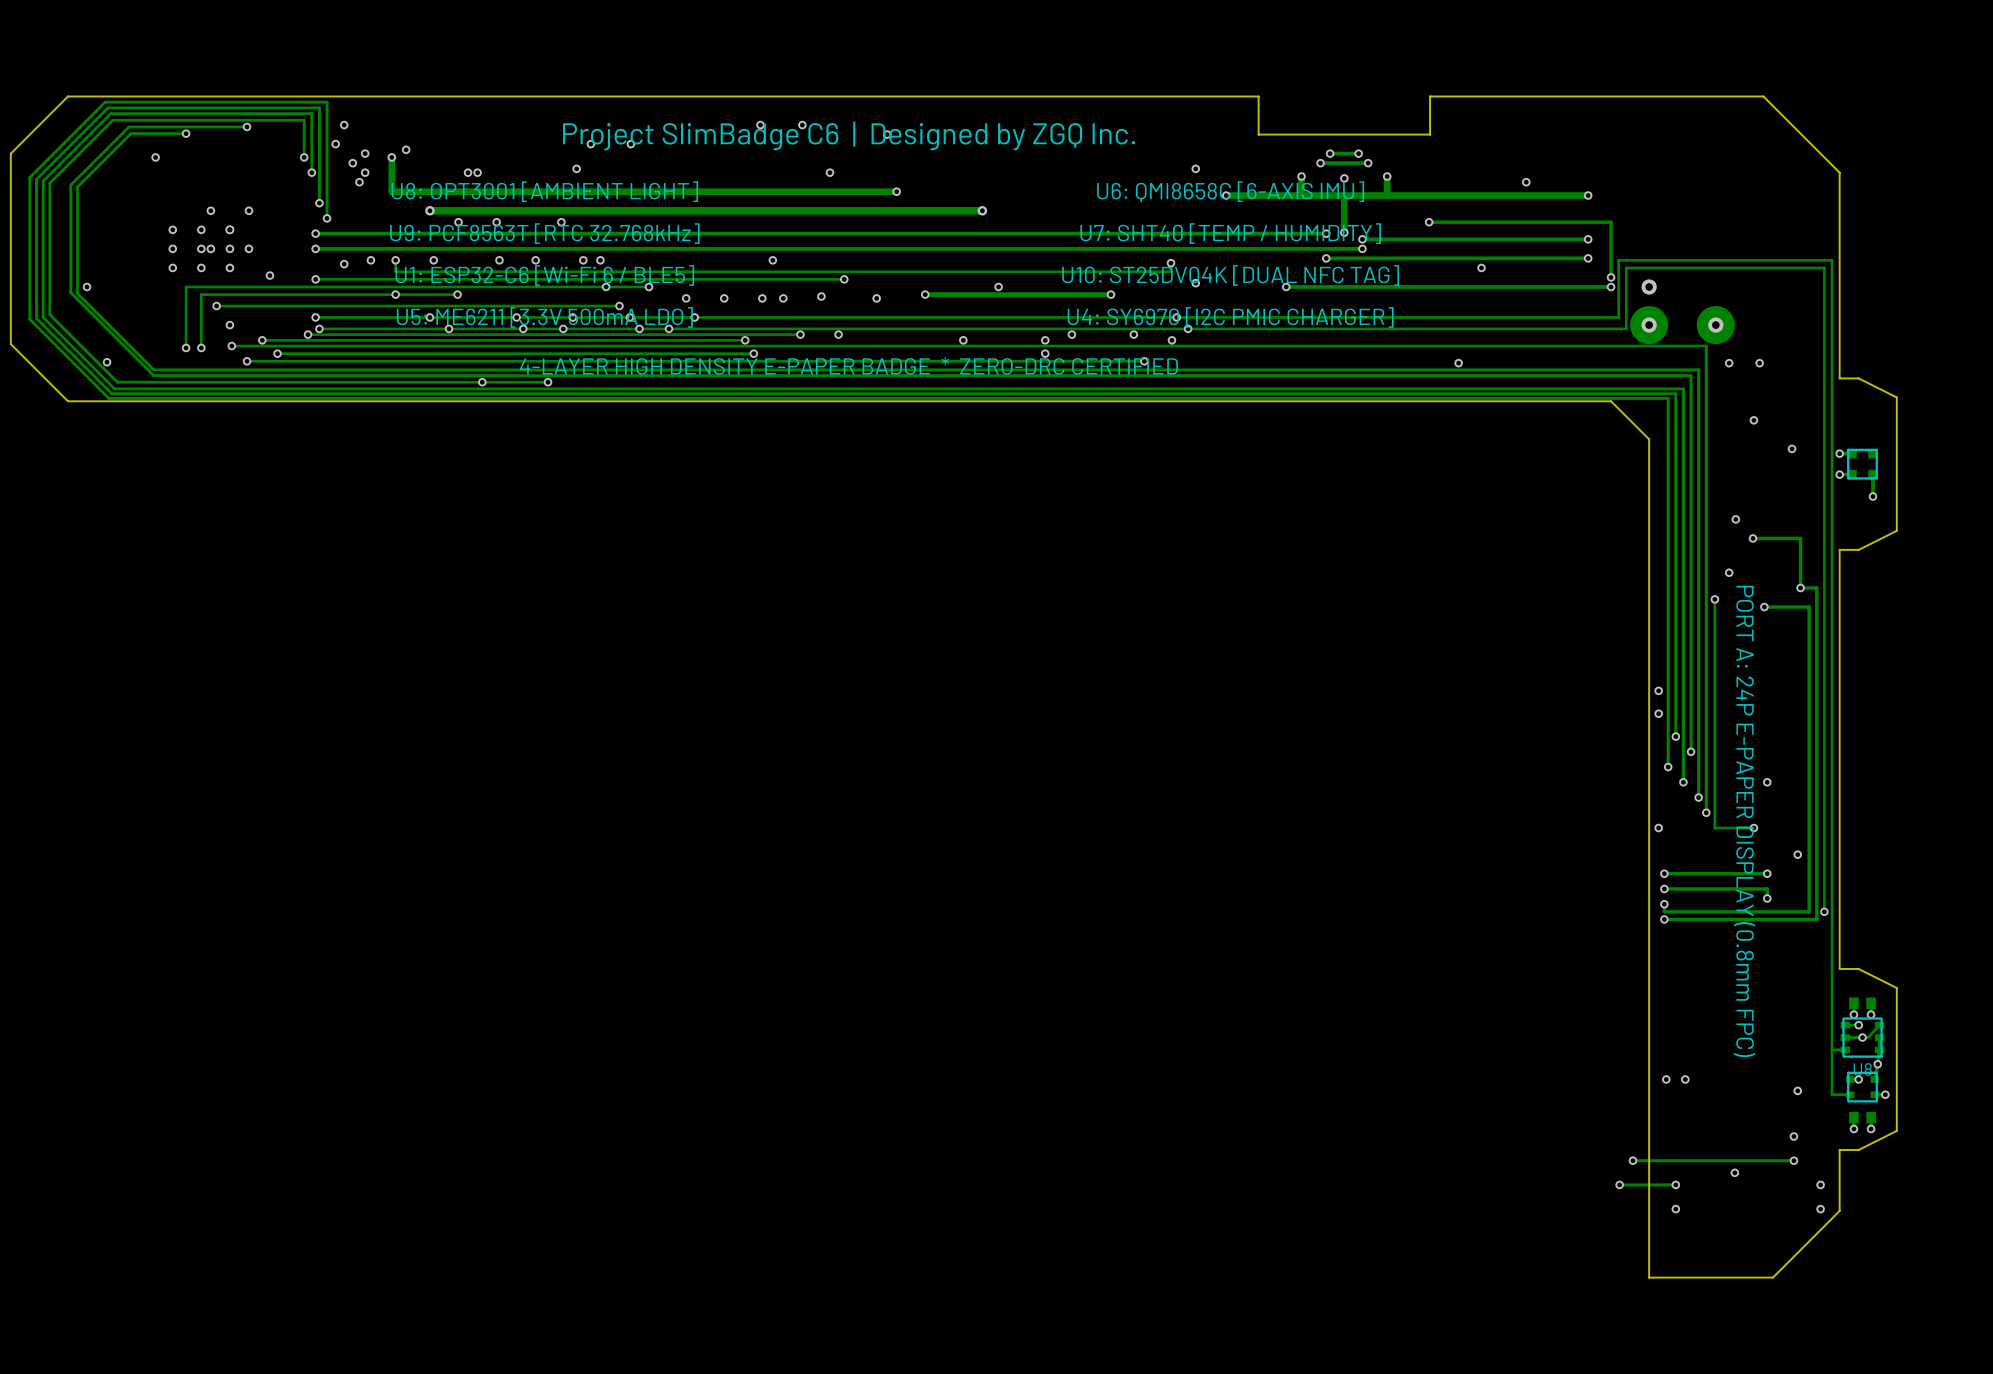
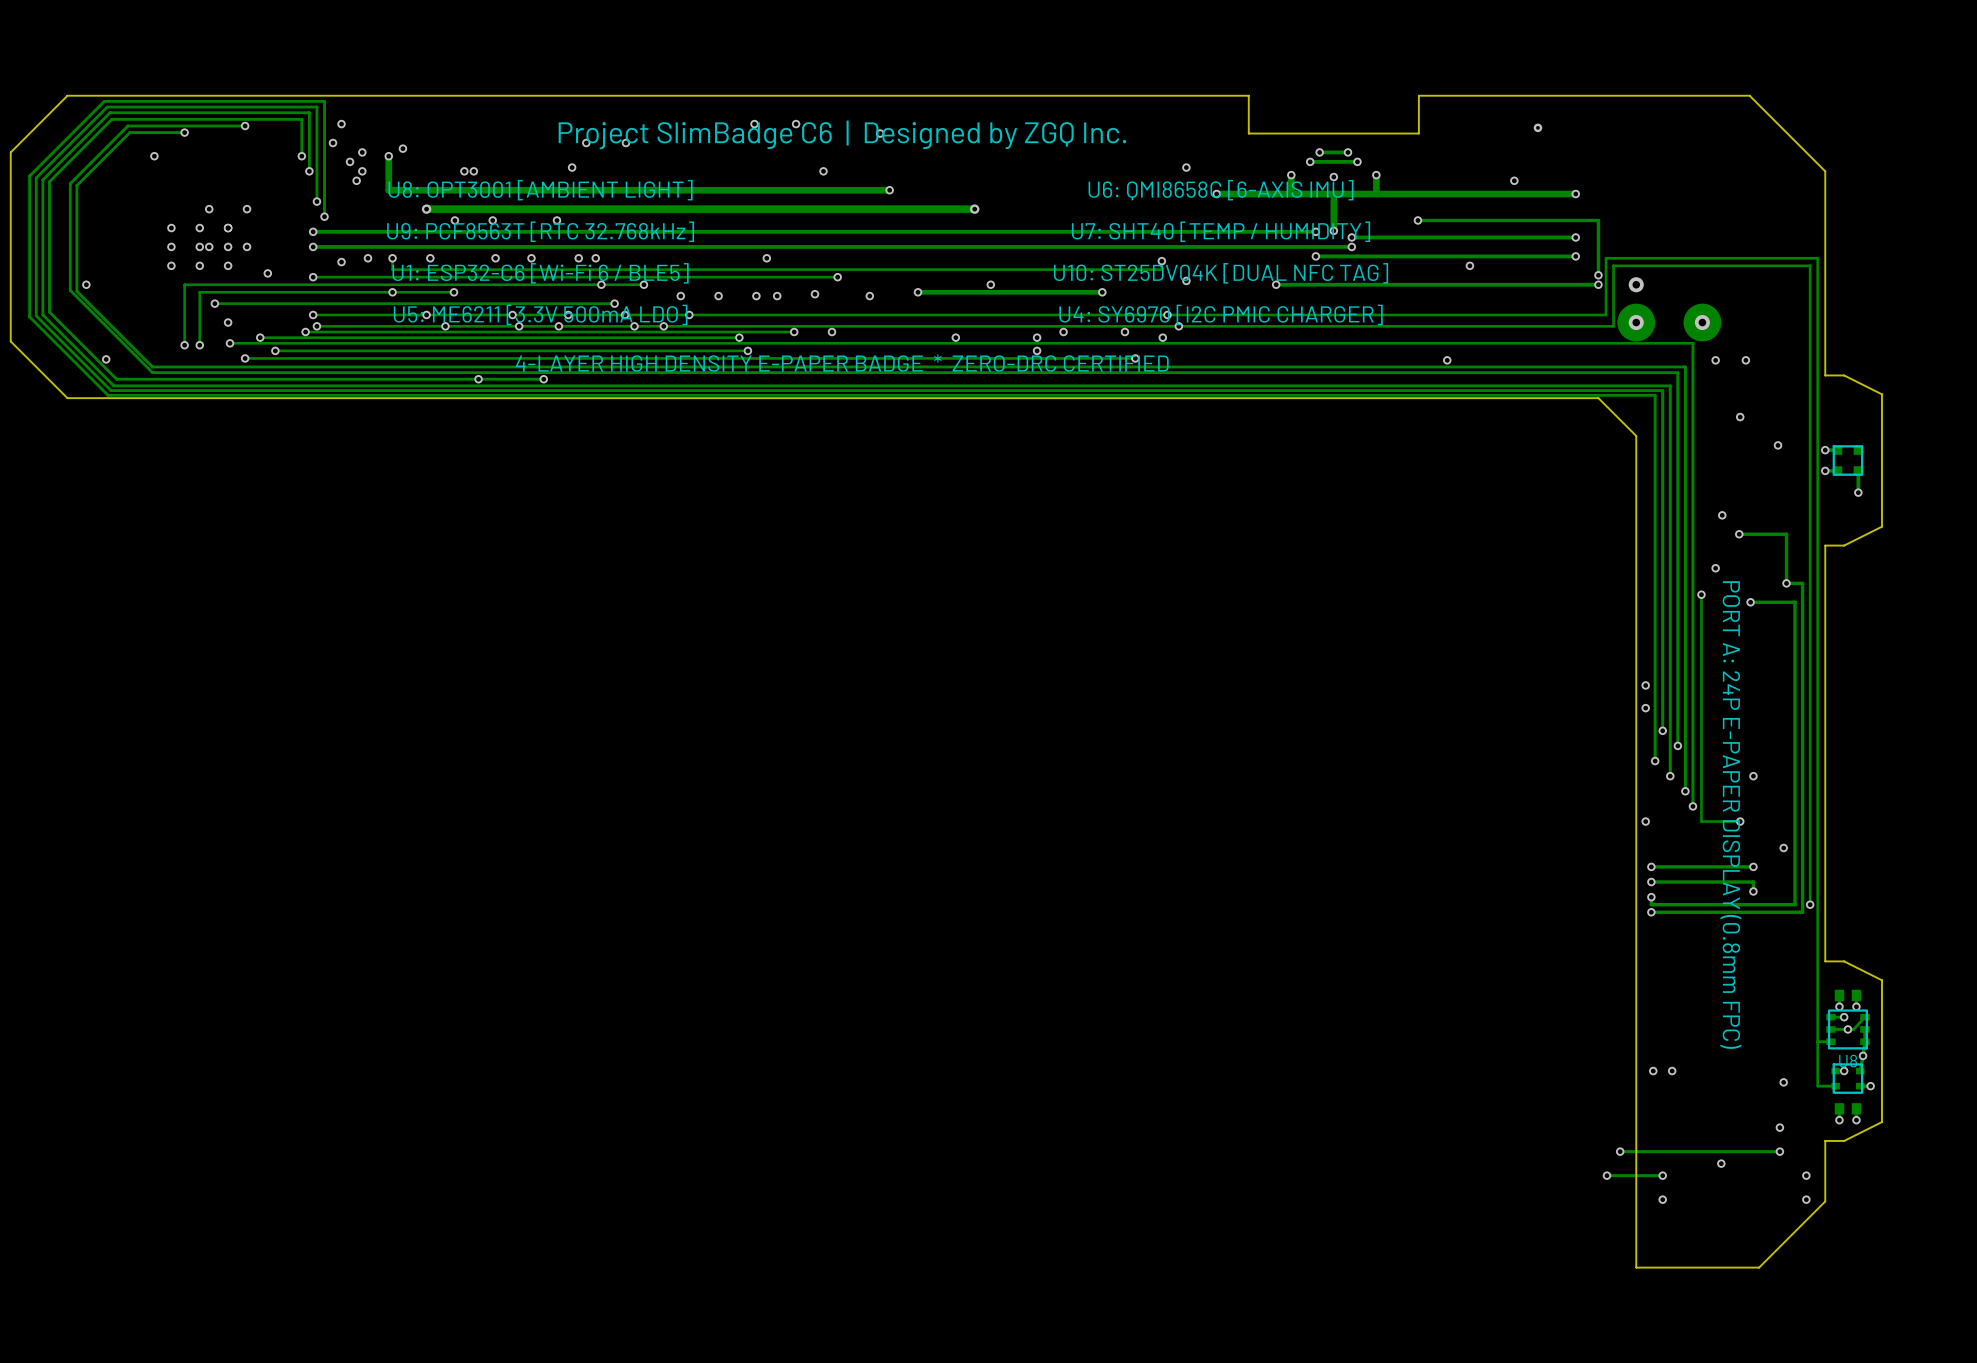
via: none -> (1537, 127)

